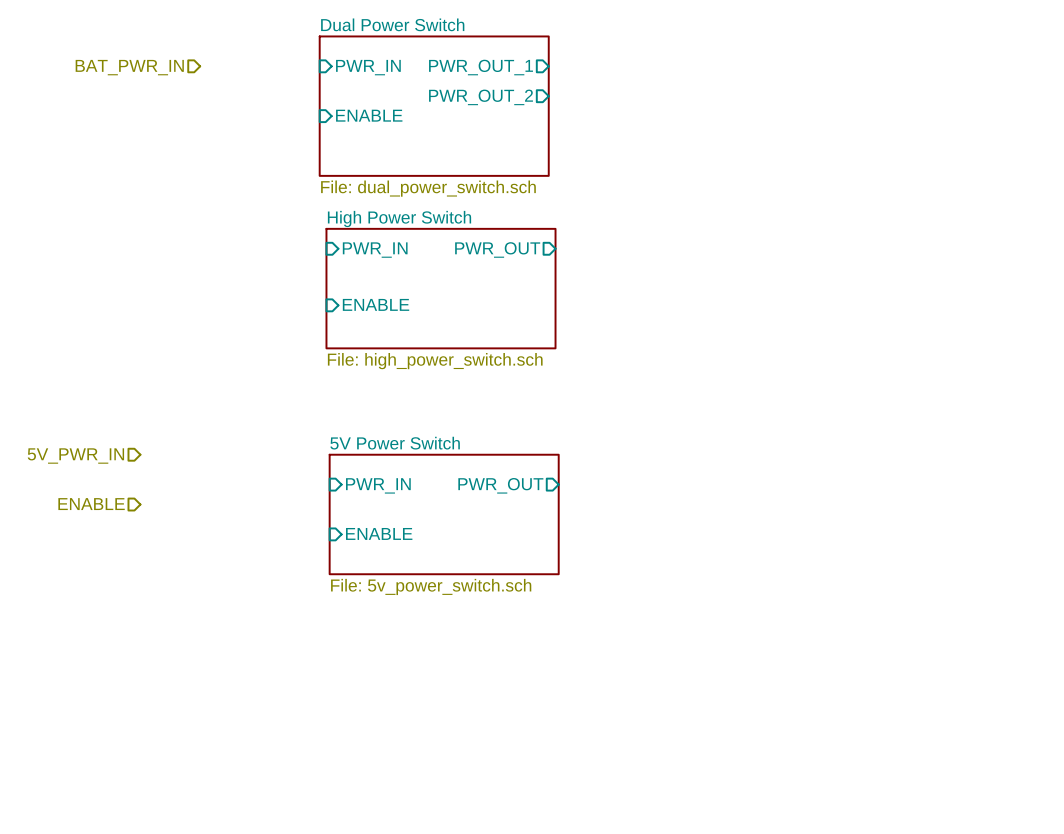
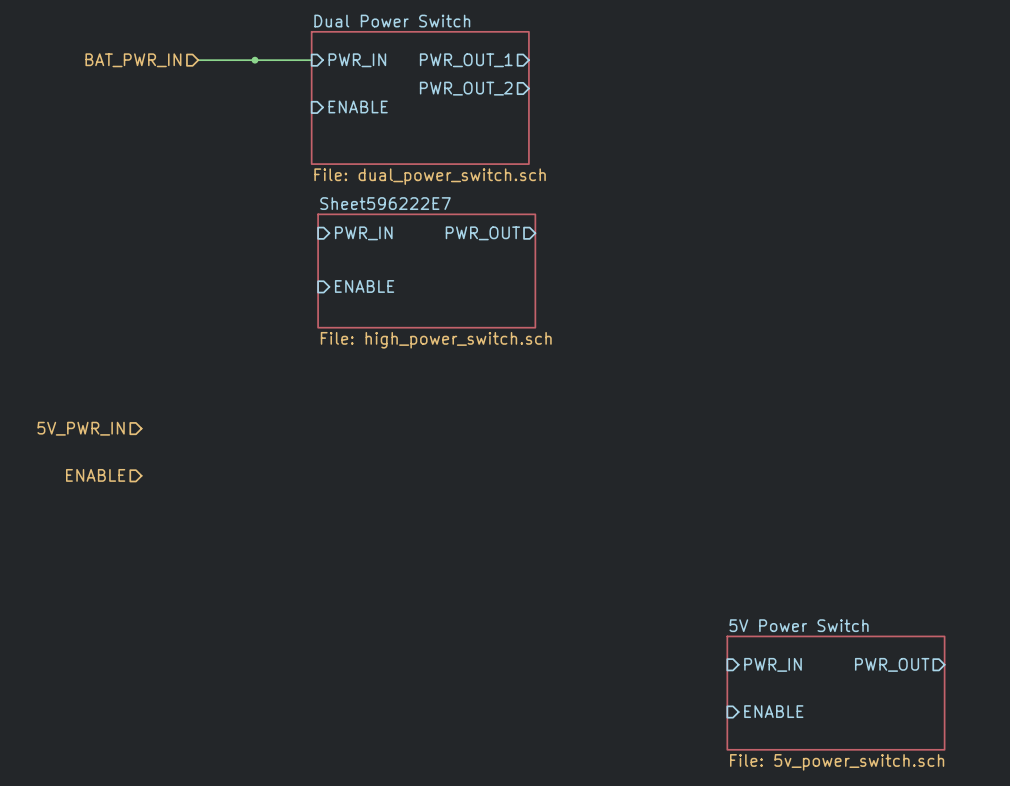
wire: none -> (198, 60) (311, 60)
junction: none -> (254, 60)
sheet High Power Switch name: High Power Switch (399, 218) -> Sheet596222E7 (385, 203)
sheet pin: PWR_IN (378, 485) -> none
sheet pin: PWR_OUT (500, 485) -> none
sheet 5V Power Switch position: (444, 514) -> (835, 693)
sheet pin: ENABLE (379, 533) -> none
sheet pin: none -> PWR_IN (773, 664)
sheet pin: none -> PWR_OUT (892, 664)
sheet pin: none -> ENABLE (773, 711)

